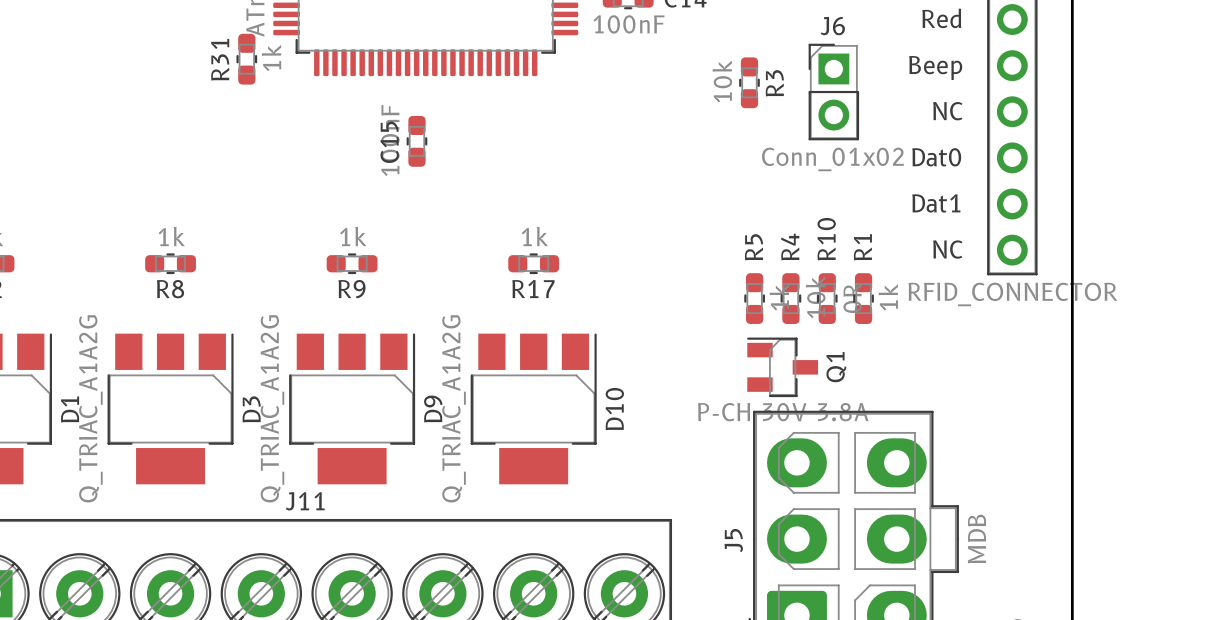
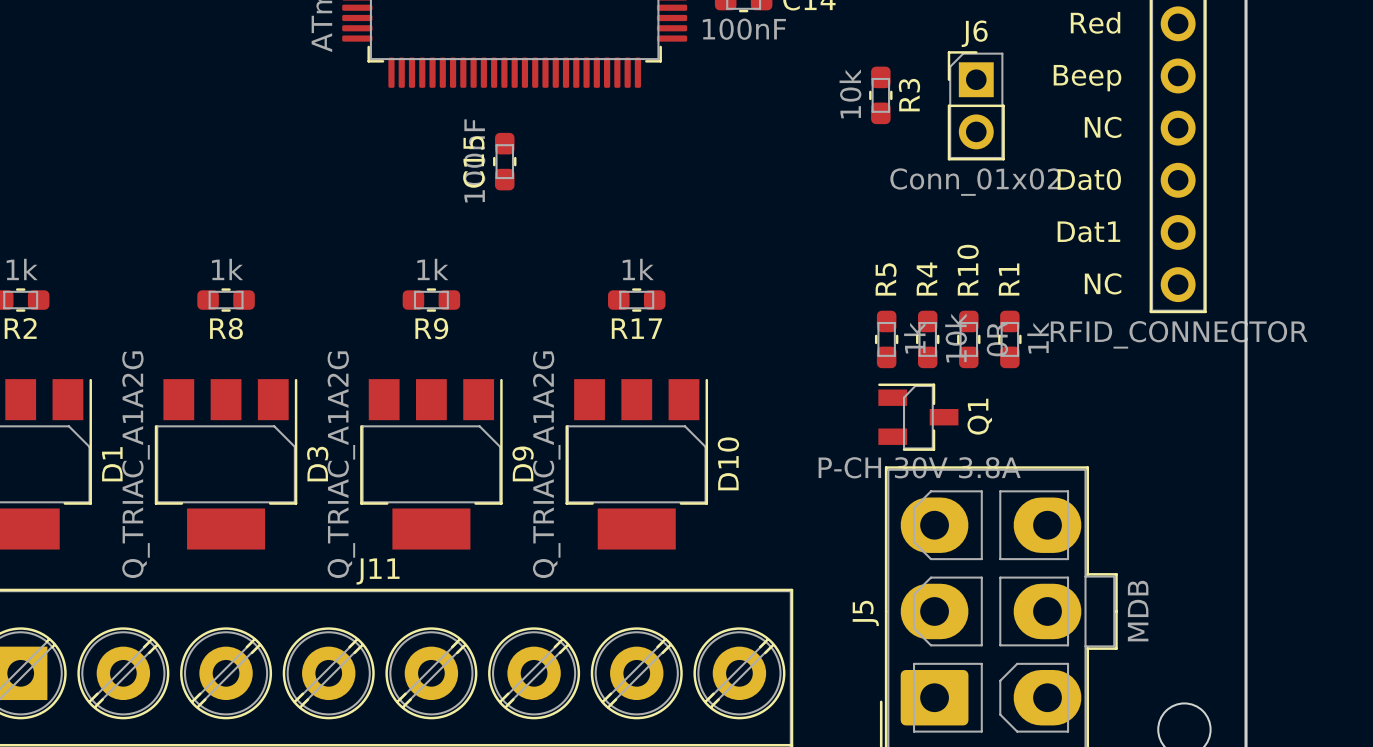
R31: 1k (246, 59) -> none

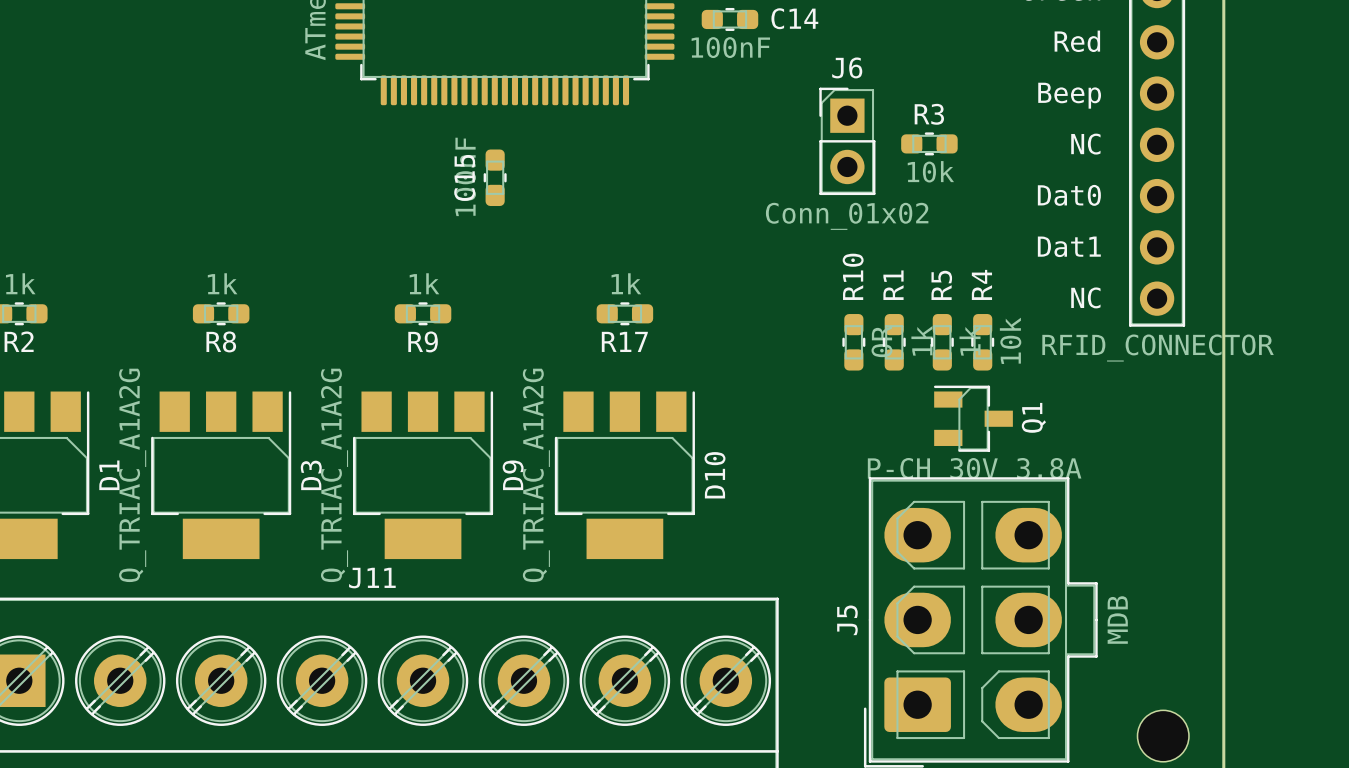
R3 value position: 10k (850, 93) -> 10k (930, 171)
R3 rotation: 0° (880, 95) -> 90° clockwise (929, 143)
R3 position: (880, 95) -> (929, 143)
R3 name position: R3 (909, 95) -> R3 (929, 114)
J6 position: (976, 105) -> (847, 141)
R5 position: (886, 339) -> (942, 342)
R4 position: (927, 339) -> (982, 342)
R10 position: (968, 339) -> (853, 342)
R1 position: (1009, 339) -> (894, 342)
Q1 position: (918, 417) -> (973, 418)

